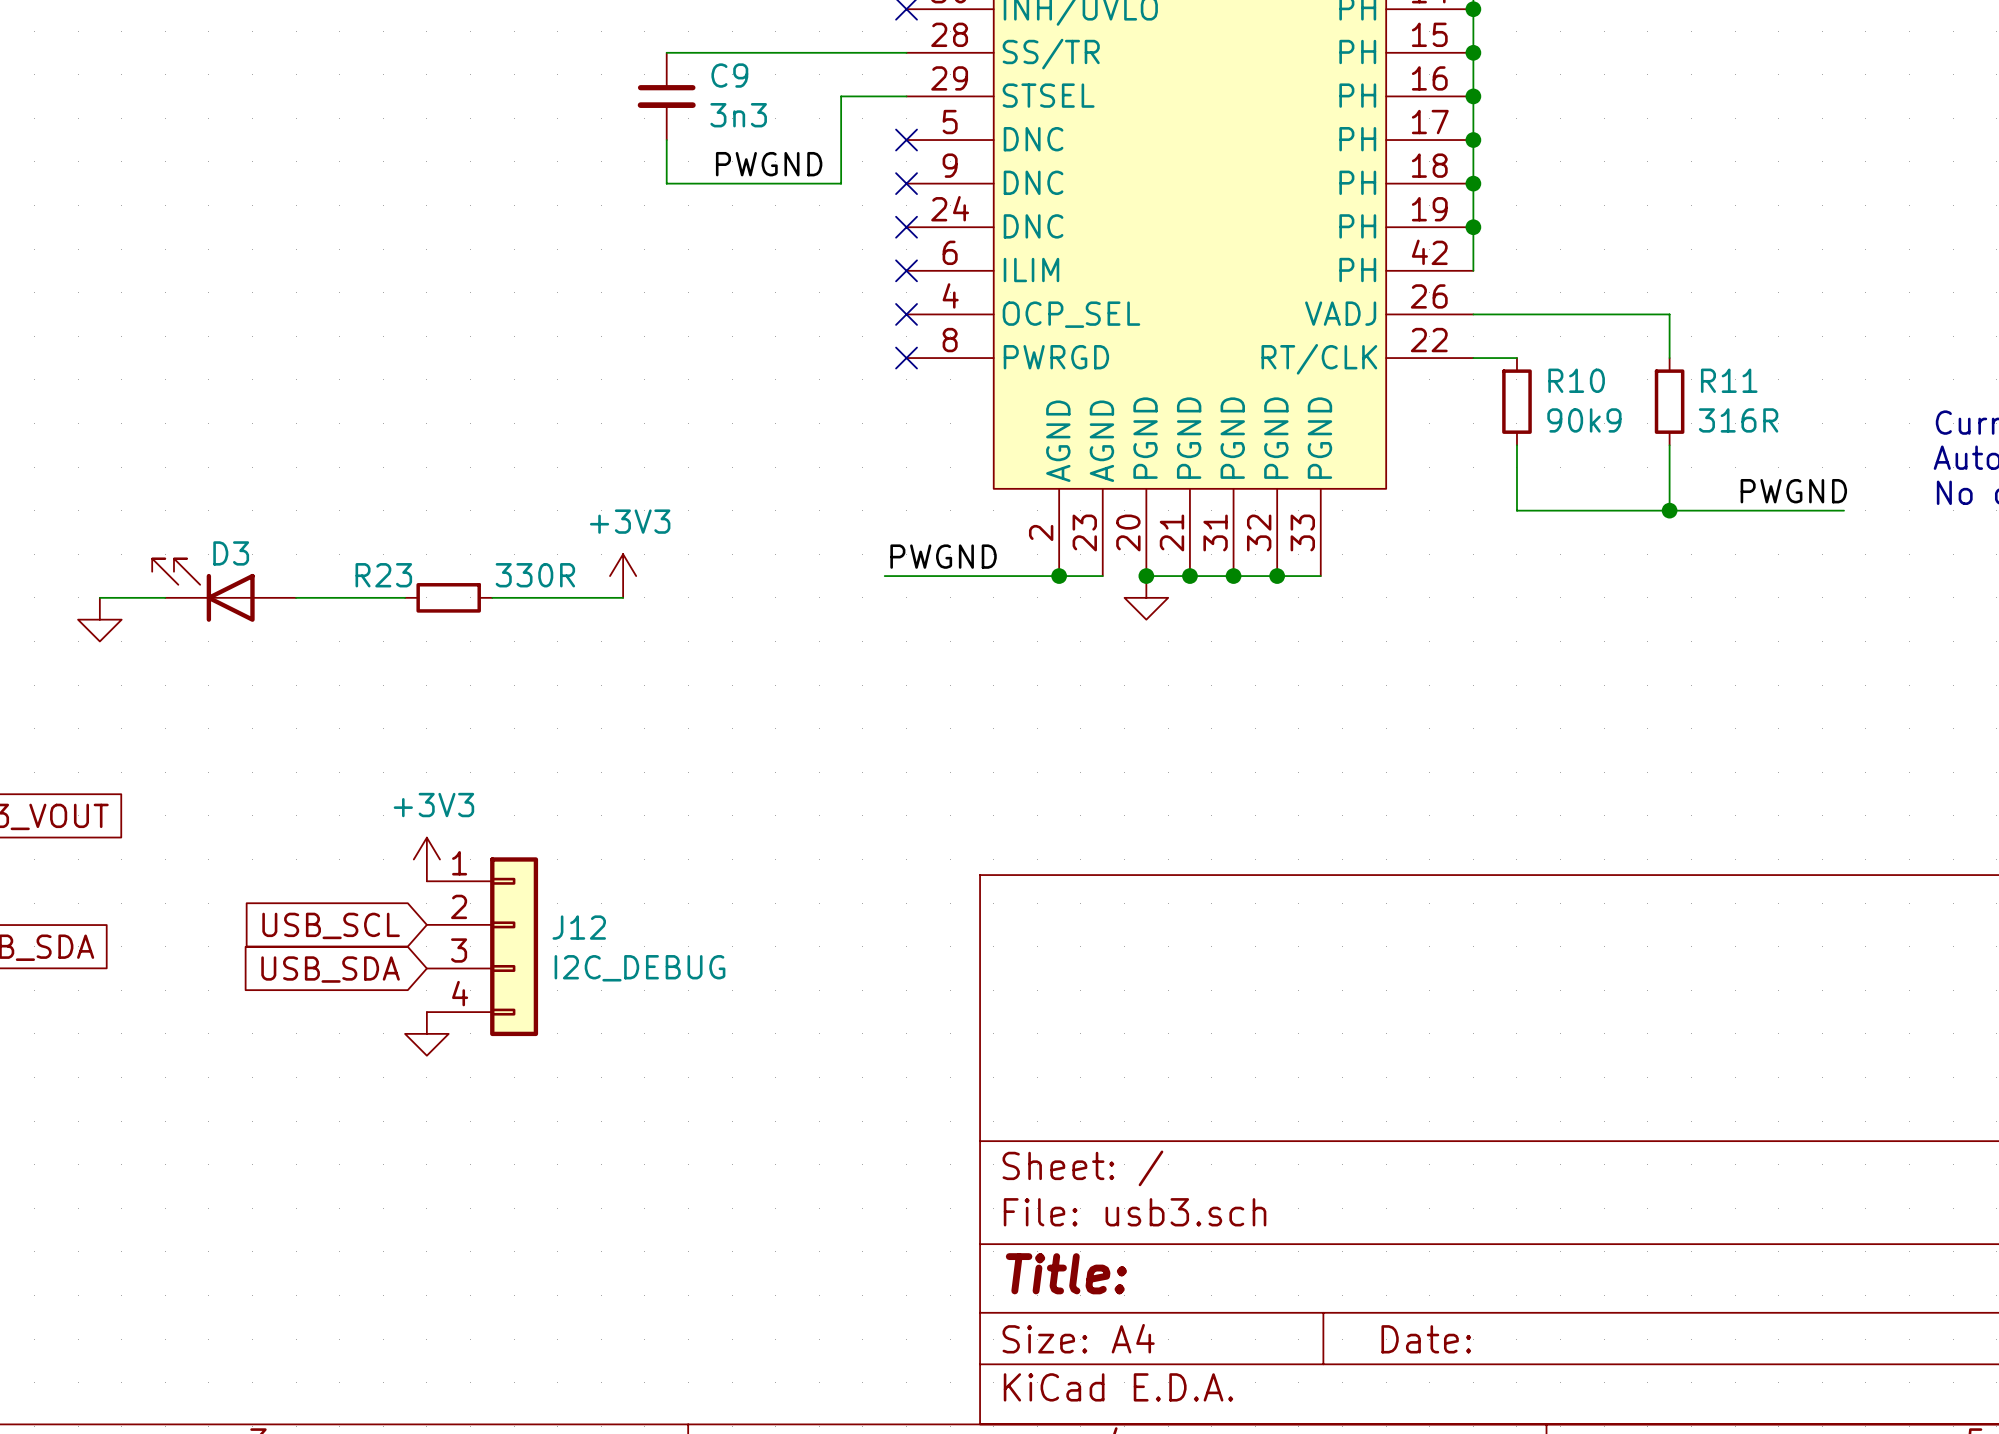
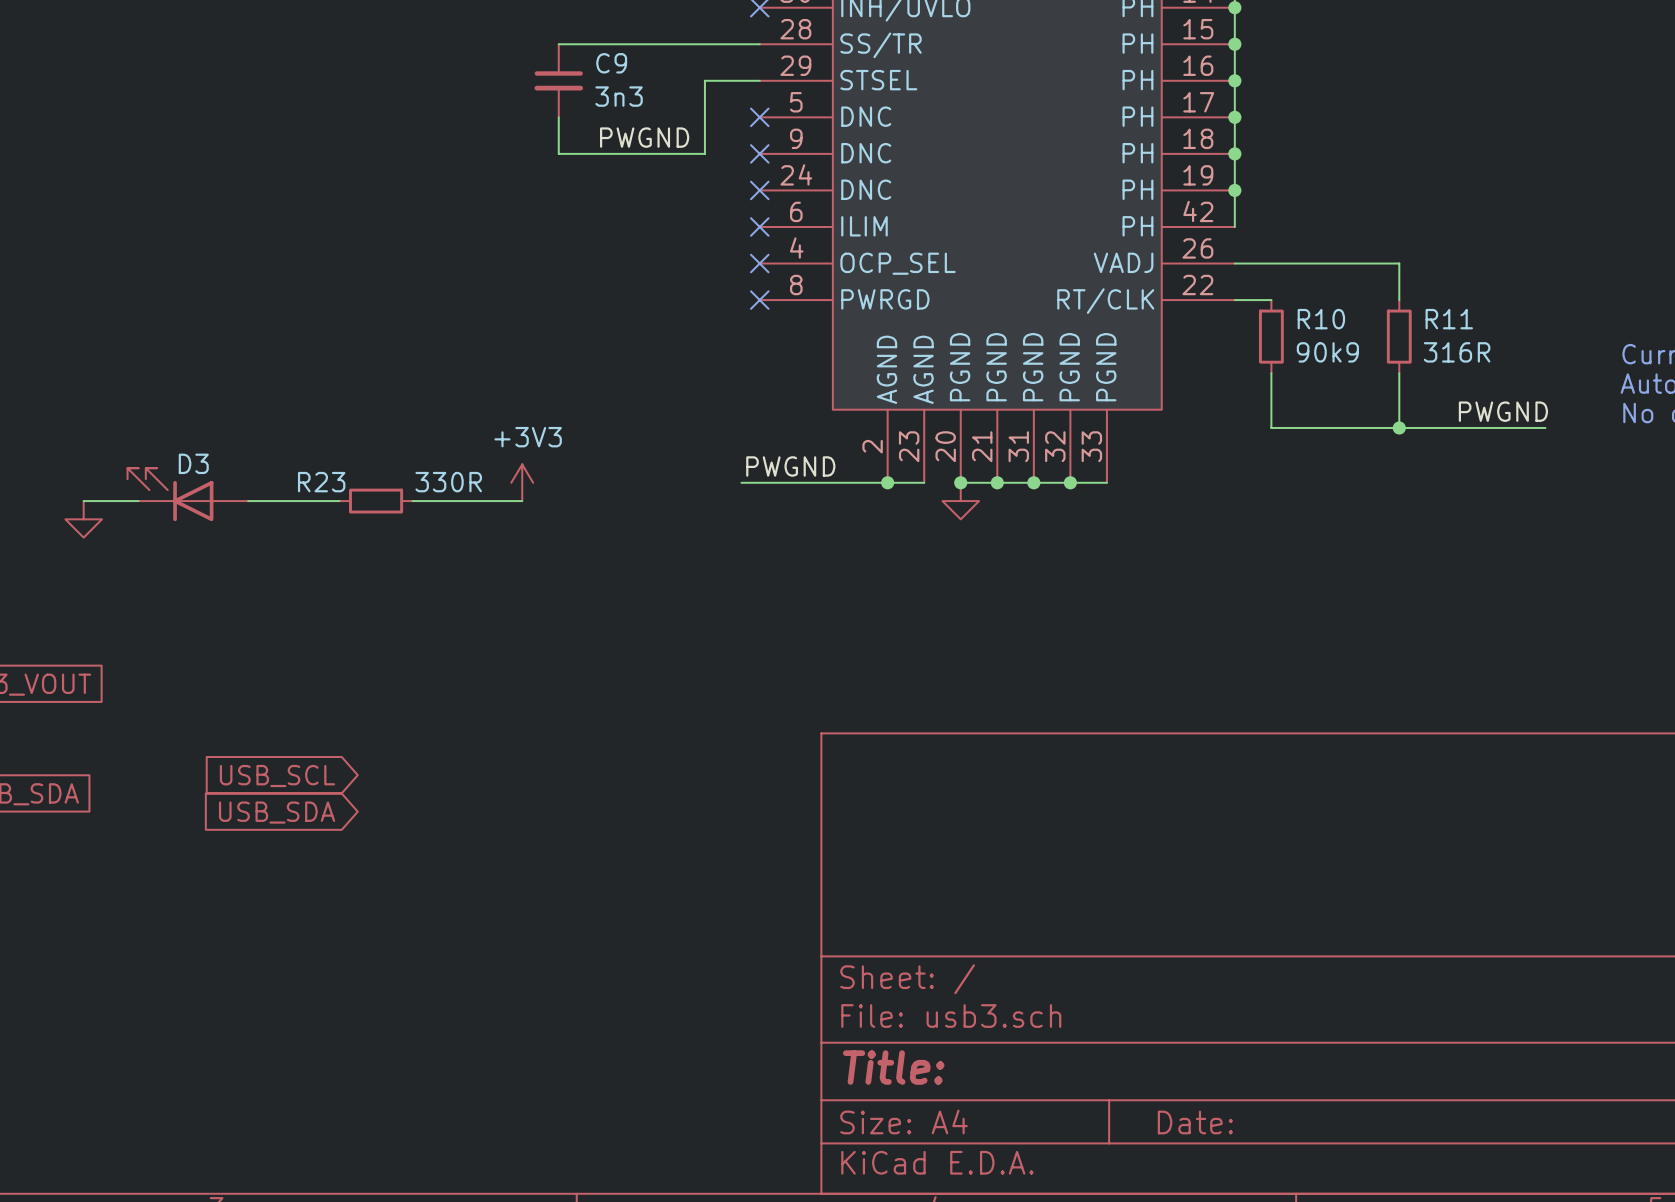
power symbol: +3V3 (426, 859) -> none
J12: I2C_DEBUG (482, 946) -> none
power symbol: (426, 1033) -> none

